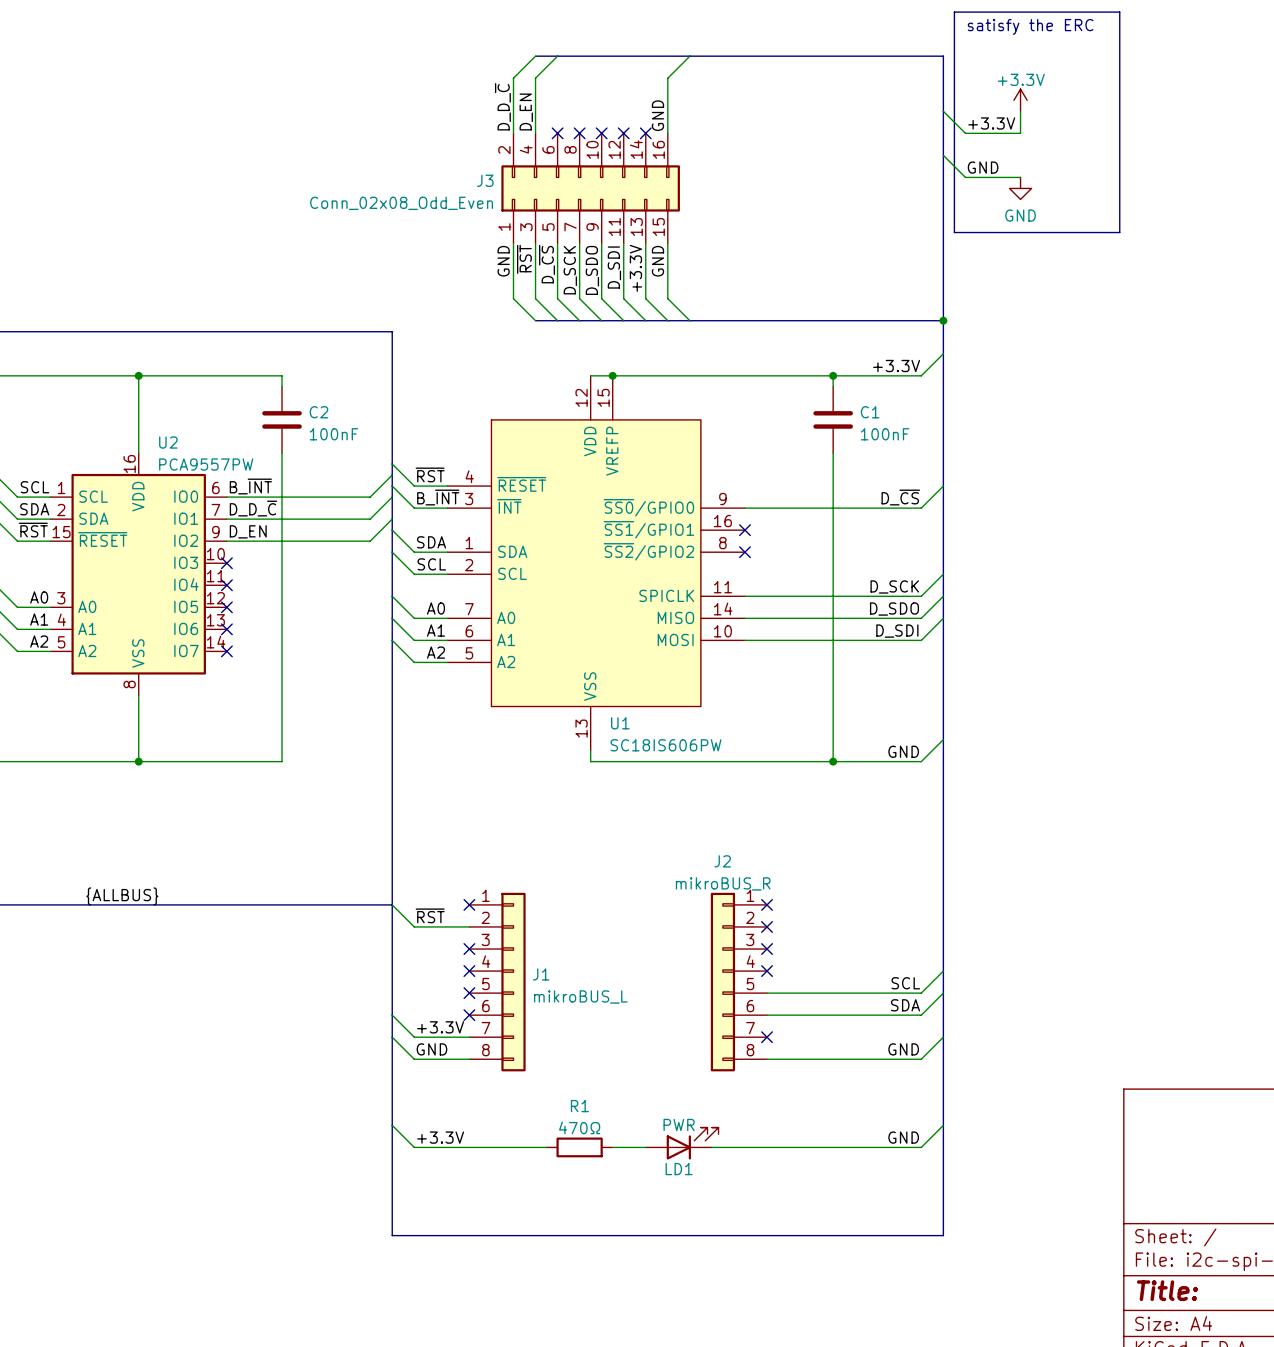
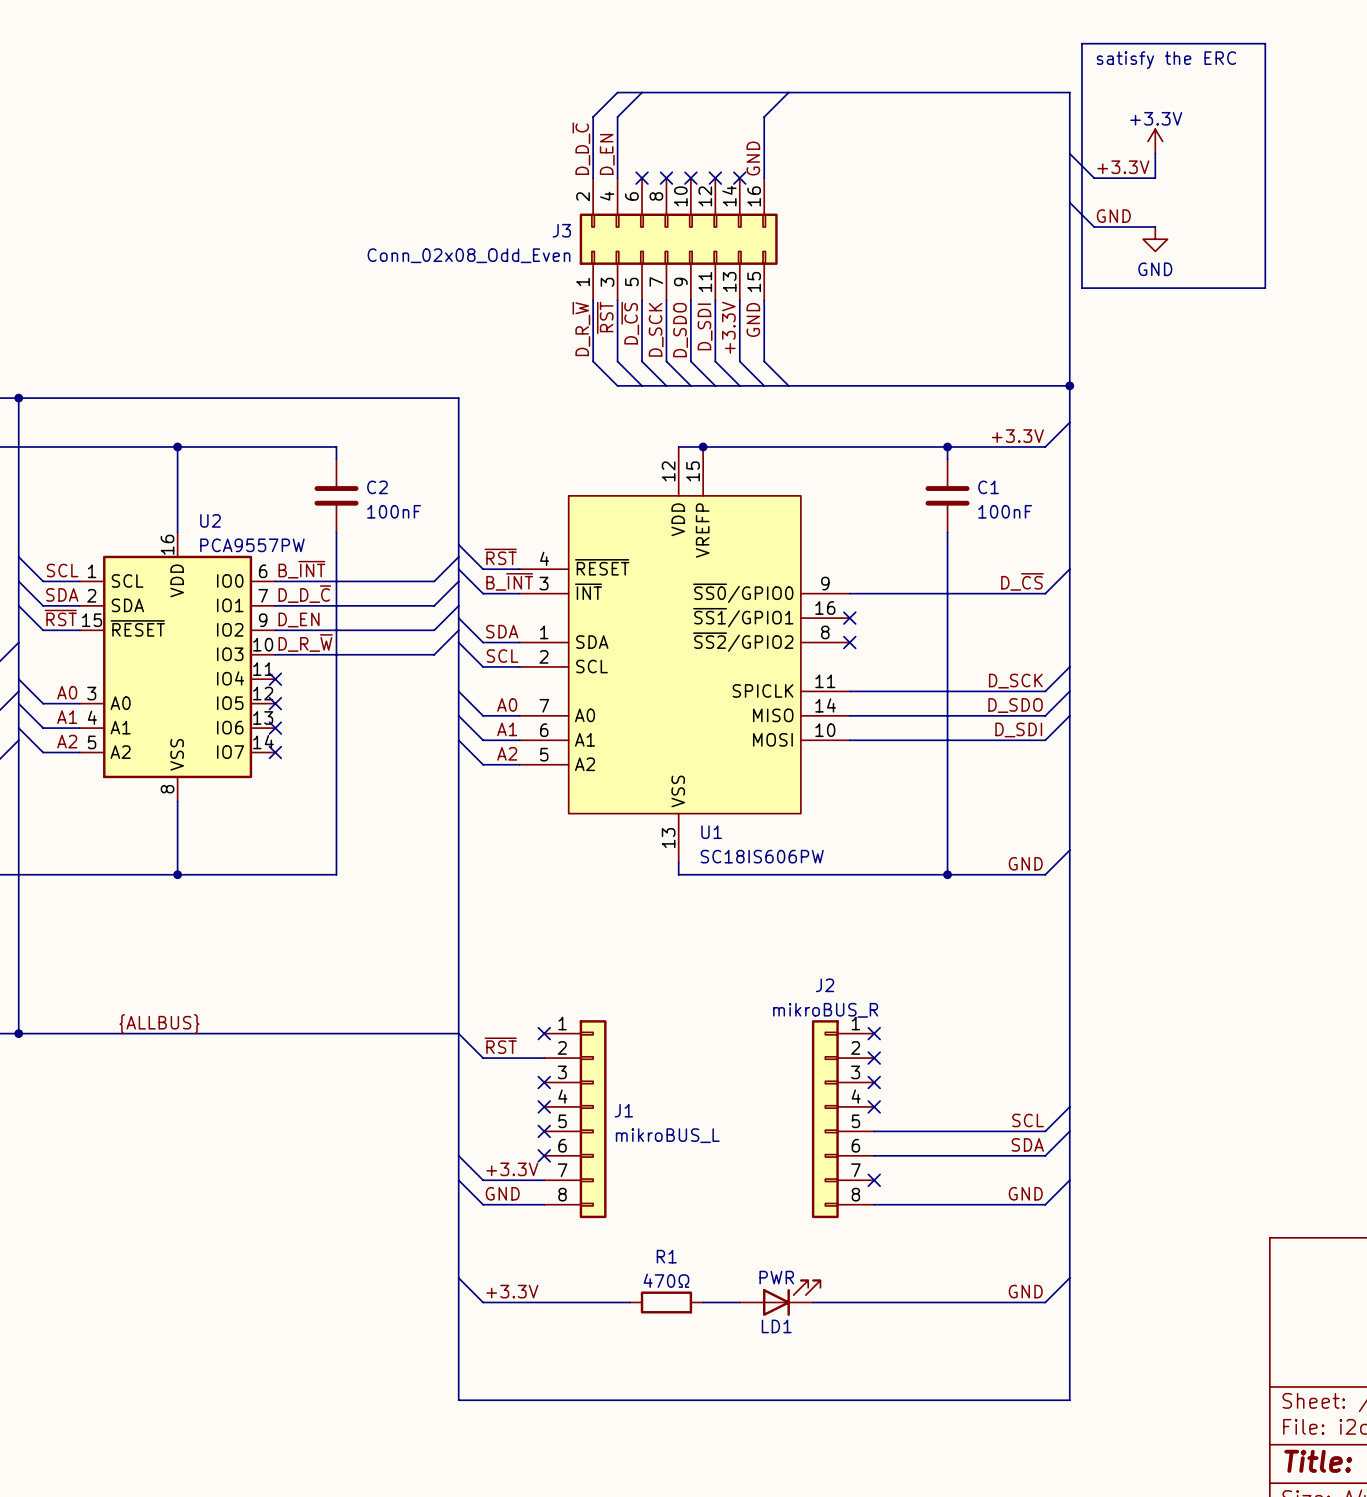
label: GND (503, 261) -> D_R_~{W} (581, 328)
wire: none -> (458, 630) (434, 654) (275, 654)
label: none -> D_R_~{W} (305, 643)
no-connect mark: (226, 563) -> none

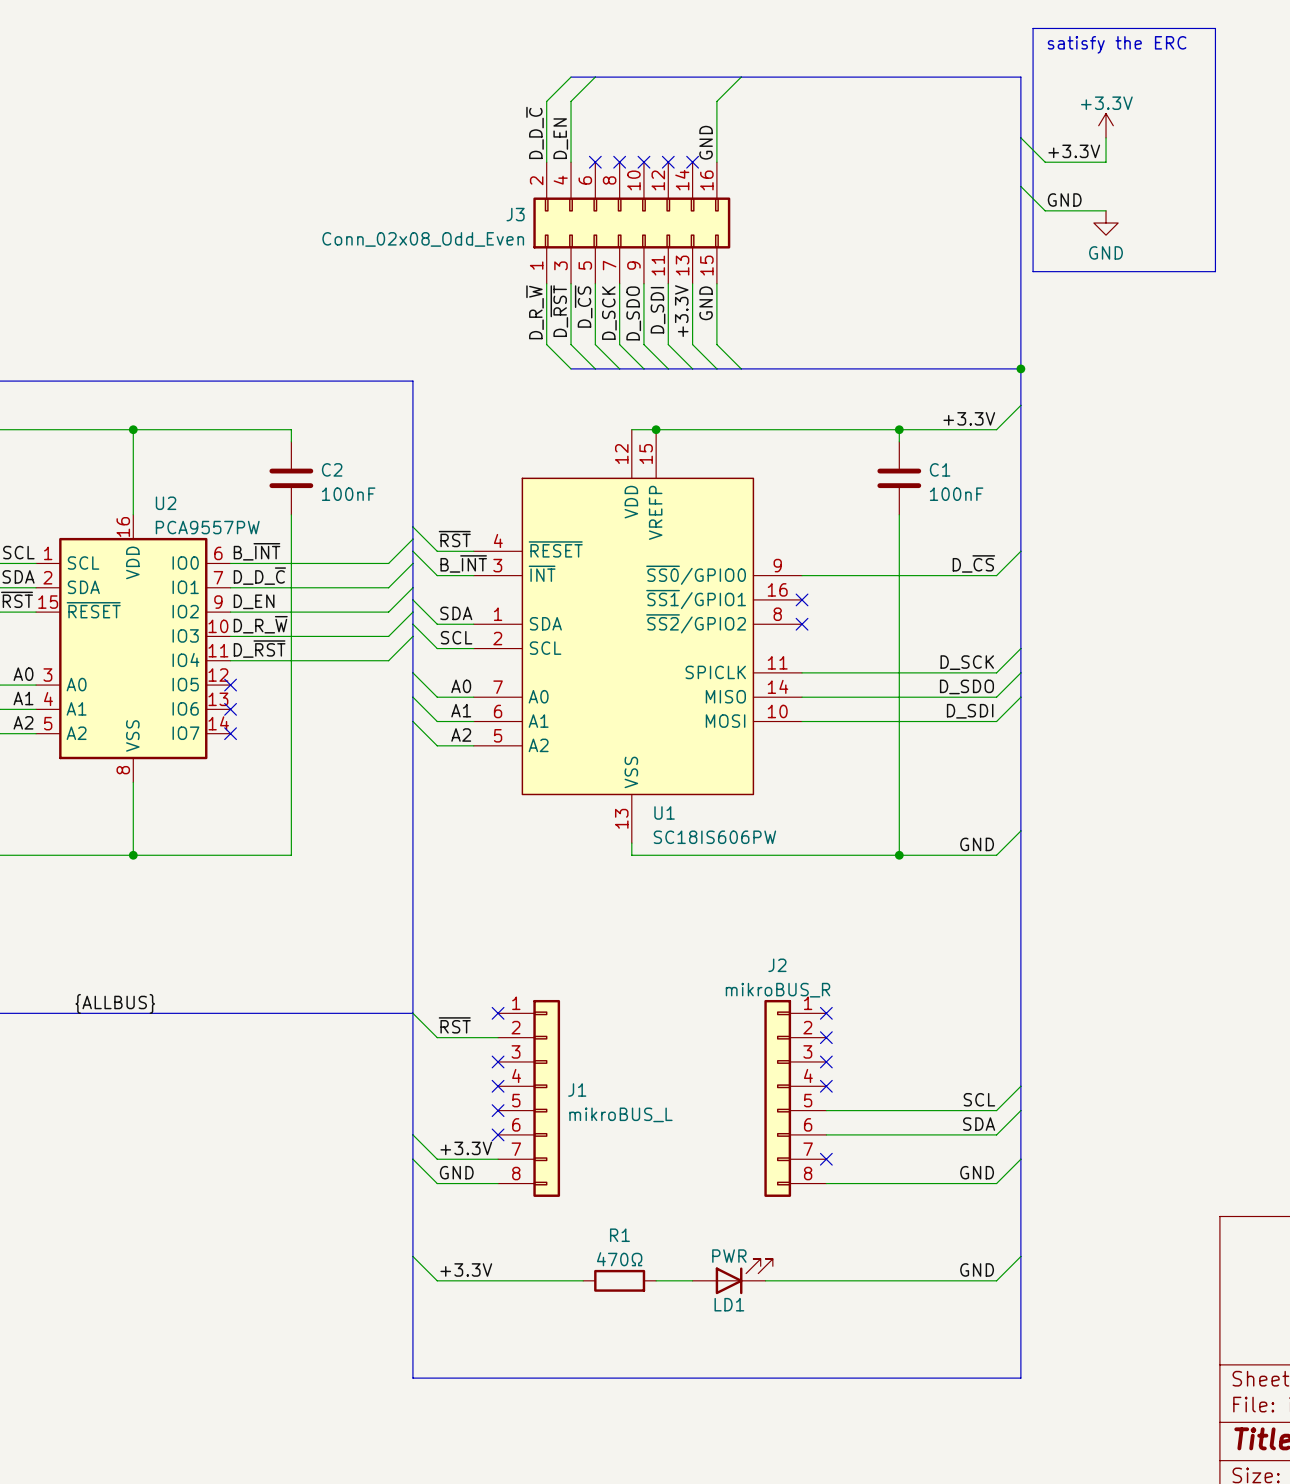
label: ~{RST} (605, 317) -> D_~{RST} (559, 311)
wire: none -> (412, 636) (388, 660) (230, 660)
label: none -> D_~{RST} (259, 649)
no-connect mark: (275, 679) -> none

